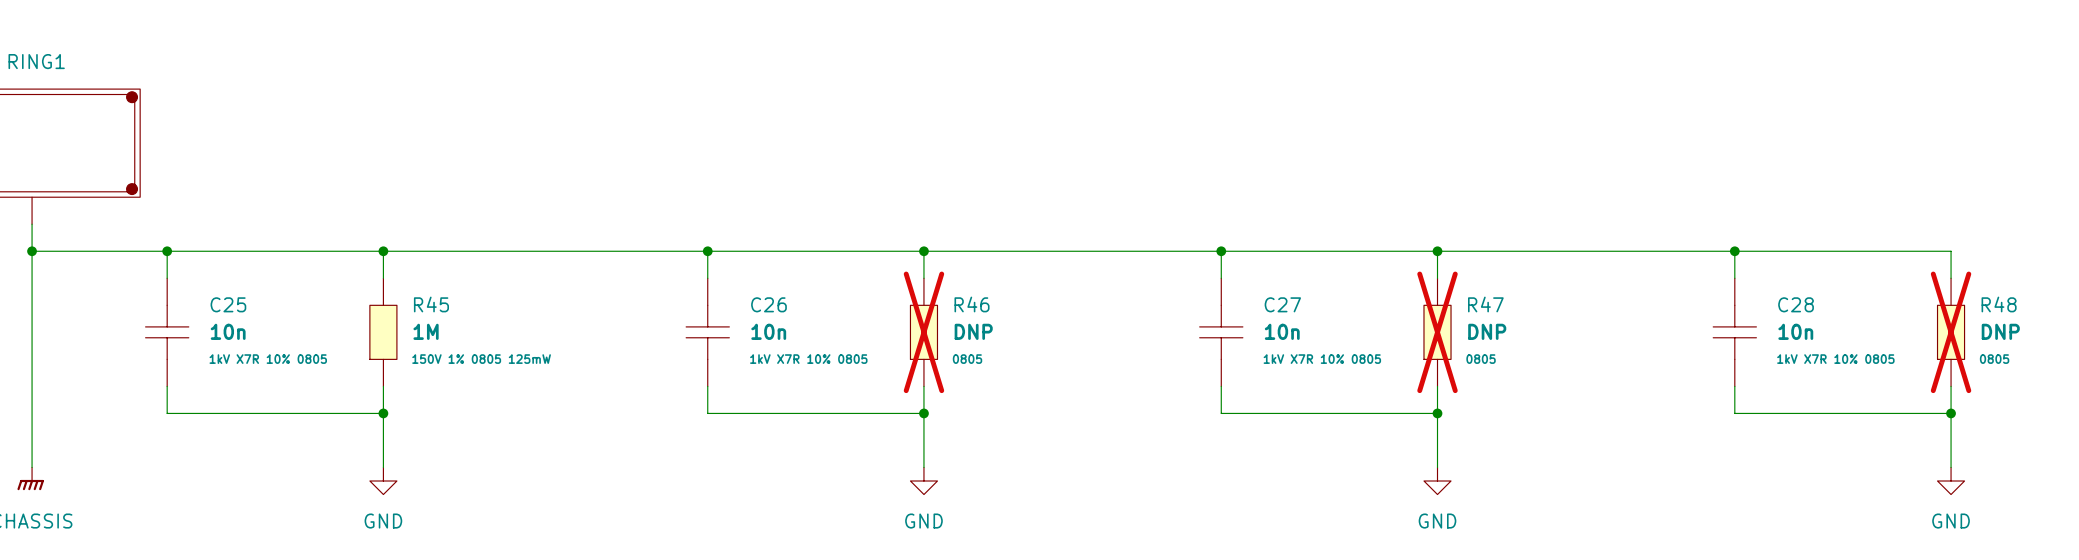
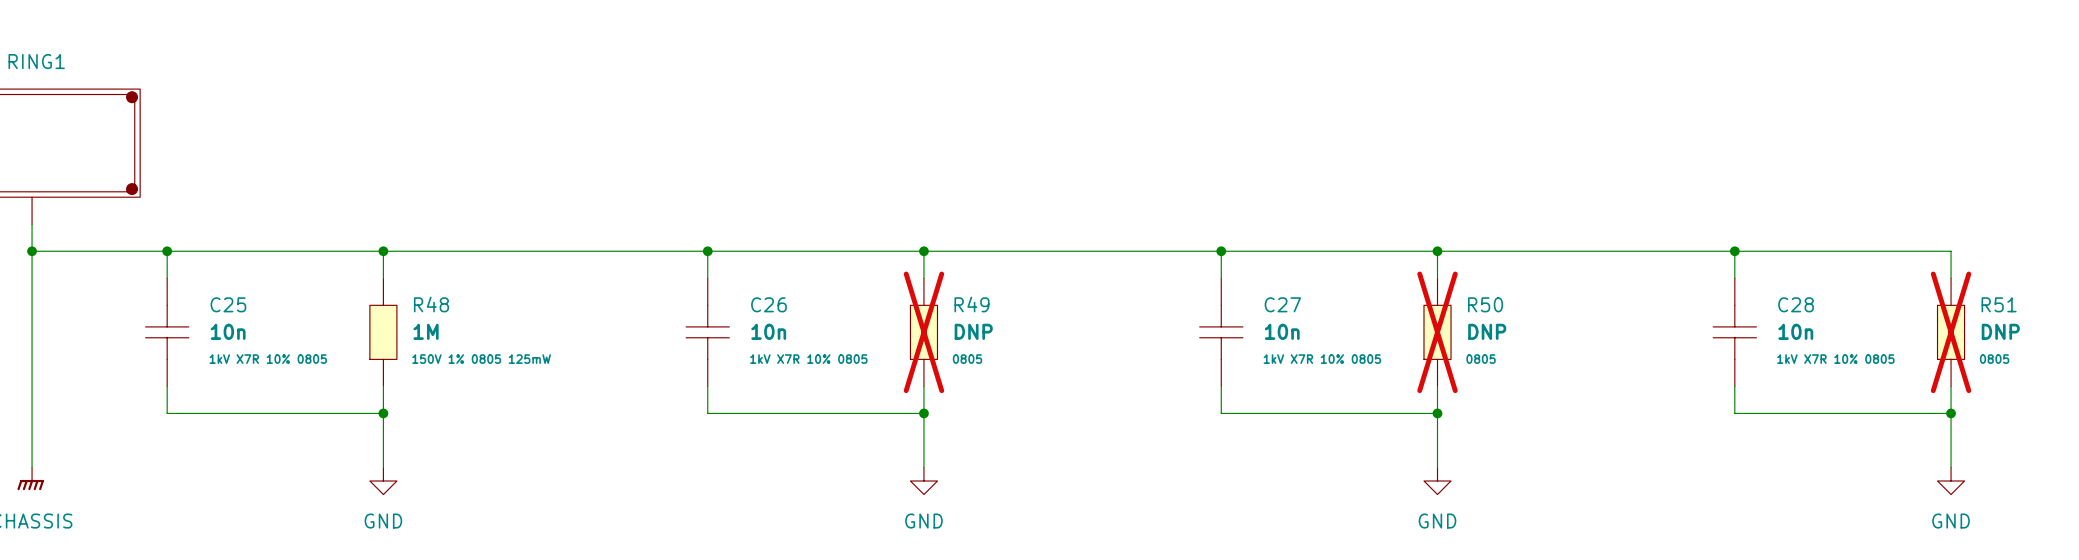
R45 name: R45 (431, 304) -> R48 (431, 304)
R46 name: R46 (972, 304) -> R49 (972, 304)
R47 name: R47 (1485, 304) -> R50 (1485, 304)
R48 name: R48 (1999, 304) -> R51 (1999, 304)

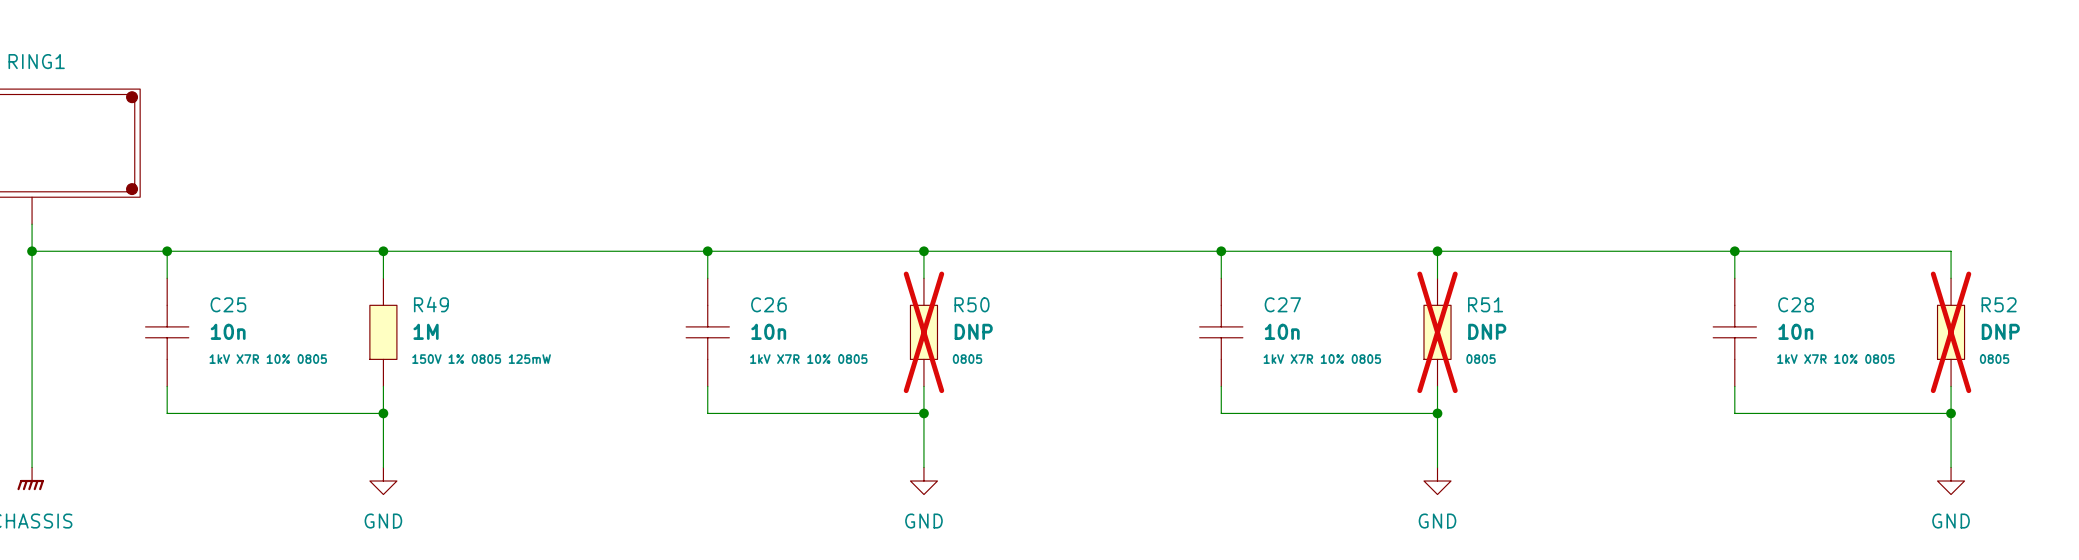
R48 name: R48 (431, 304) -> R49 (431, 304)
R49 name: R49 (972, 304) -> R50 (972, 304)
R50 name: R50 (1485, 304) -> R51 (1485, 304)
R51 name: R51 (1999, 304) -> R52 (1999, 304)

